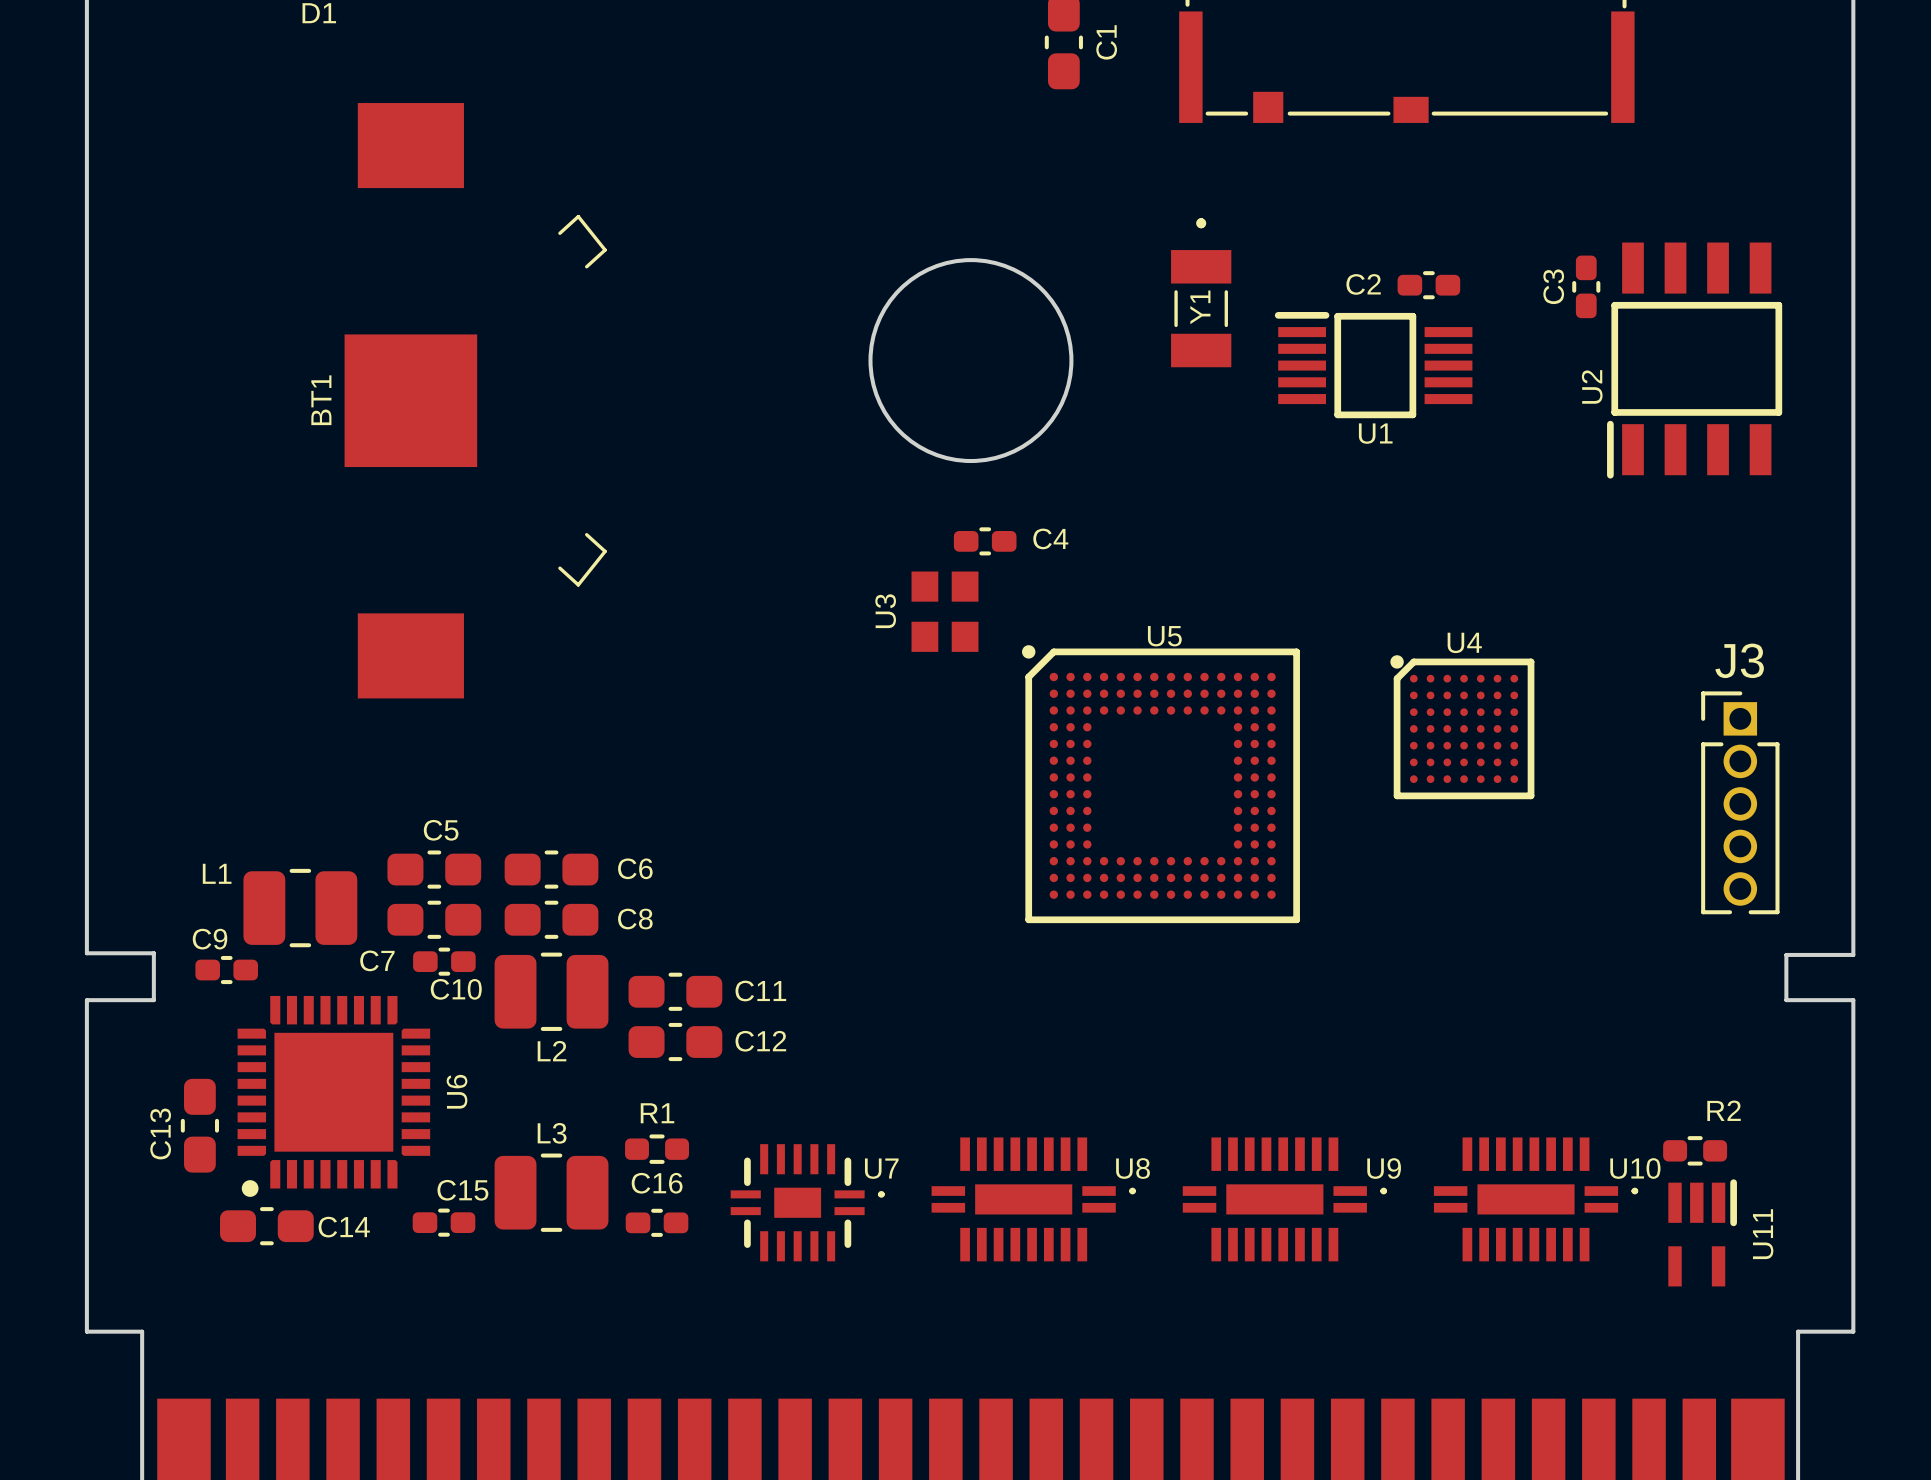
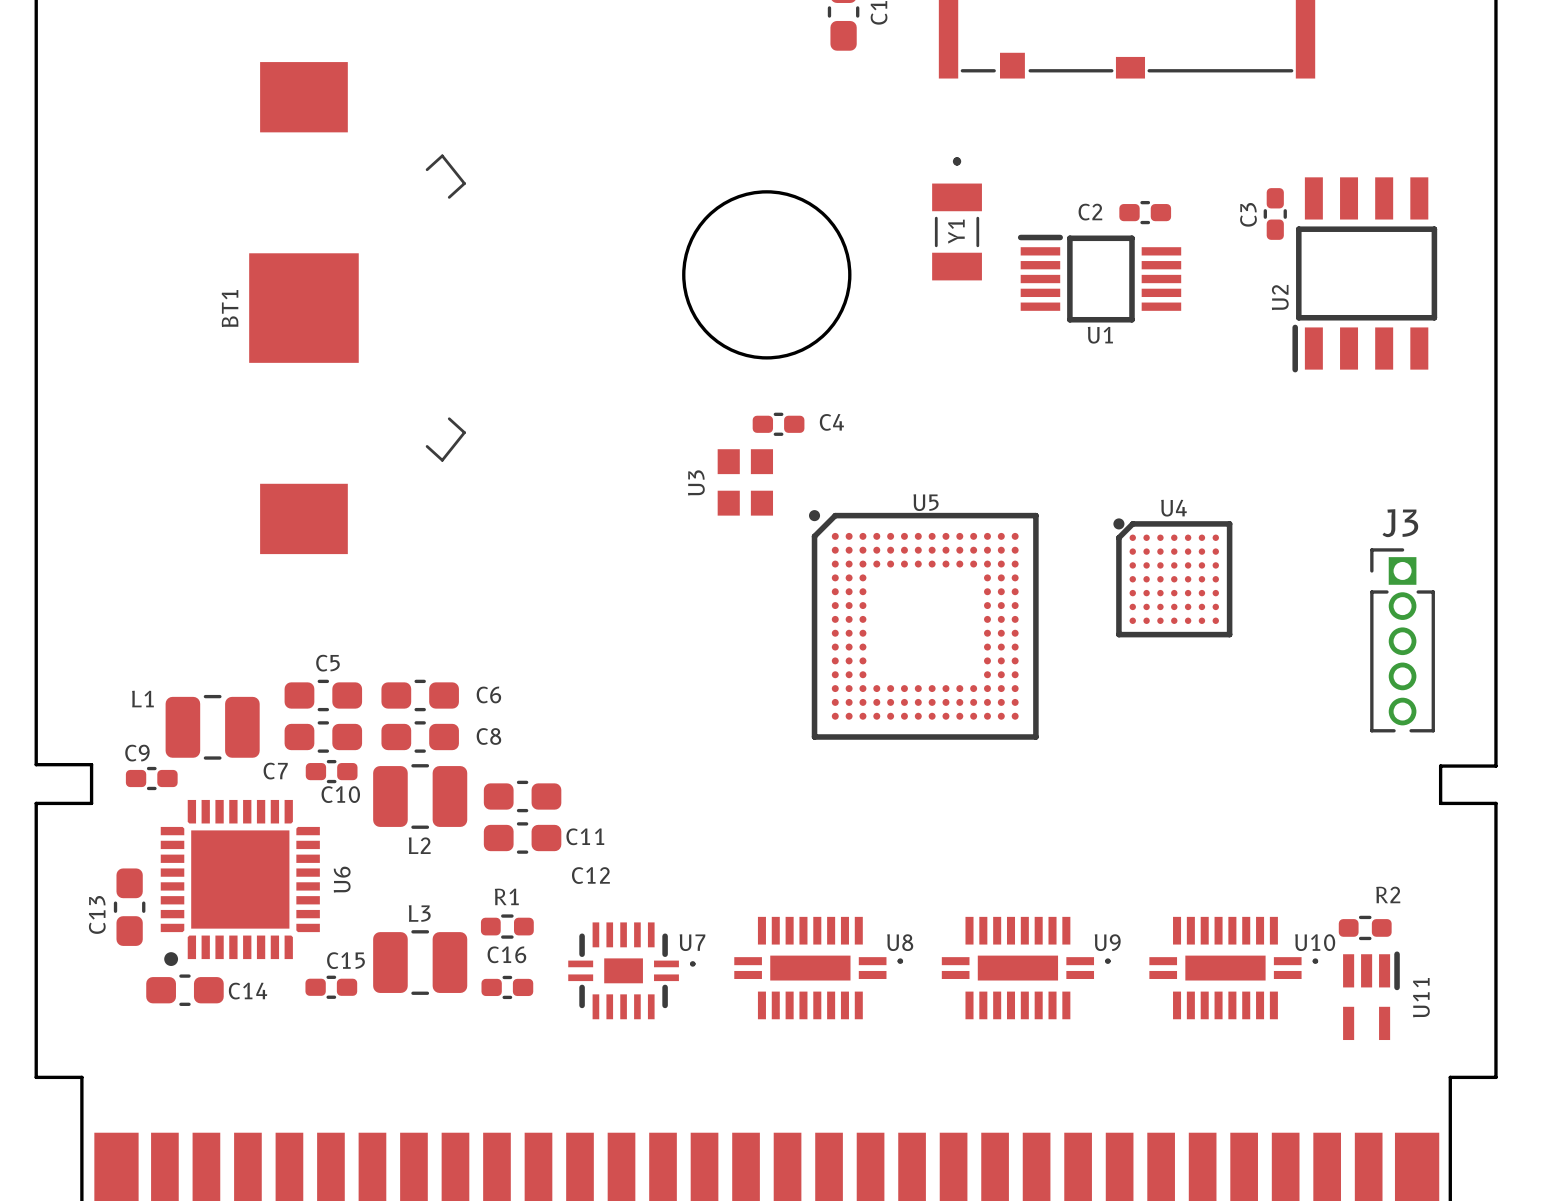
C11 name position: C11 (760, 991) -> C11 (585, 836)
C12 name position: C12 (760, 1041) -> C12 (590, 875)

